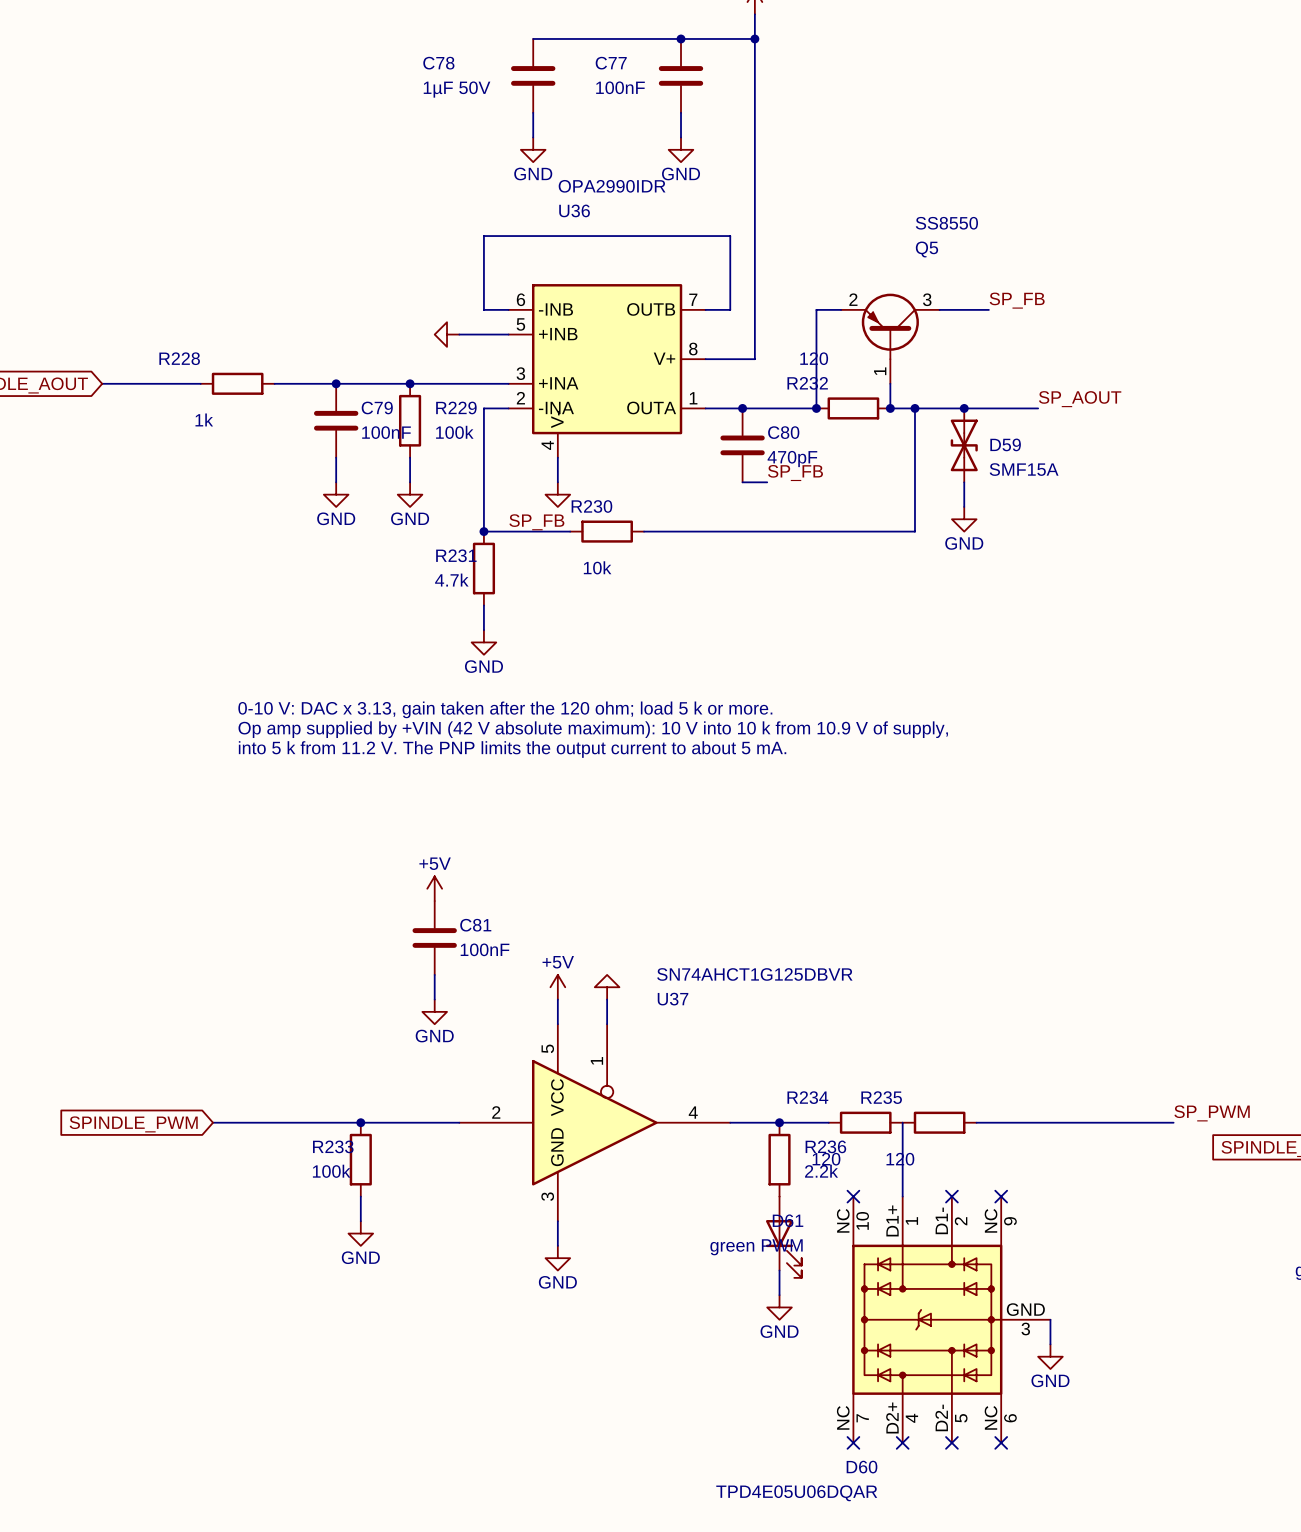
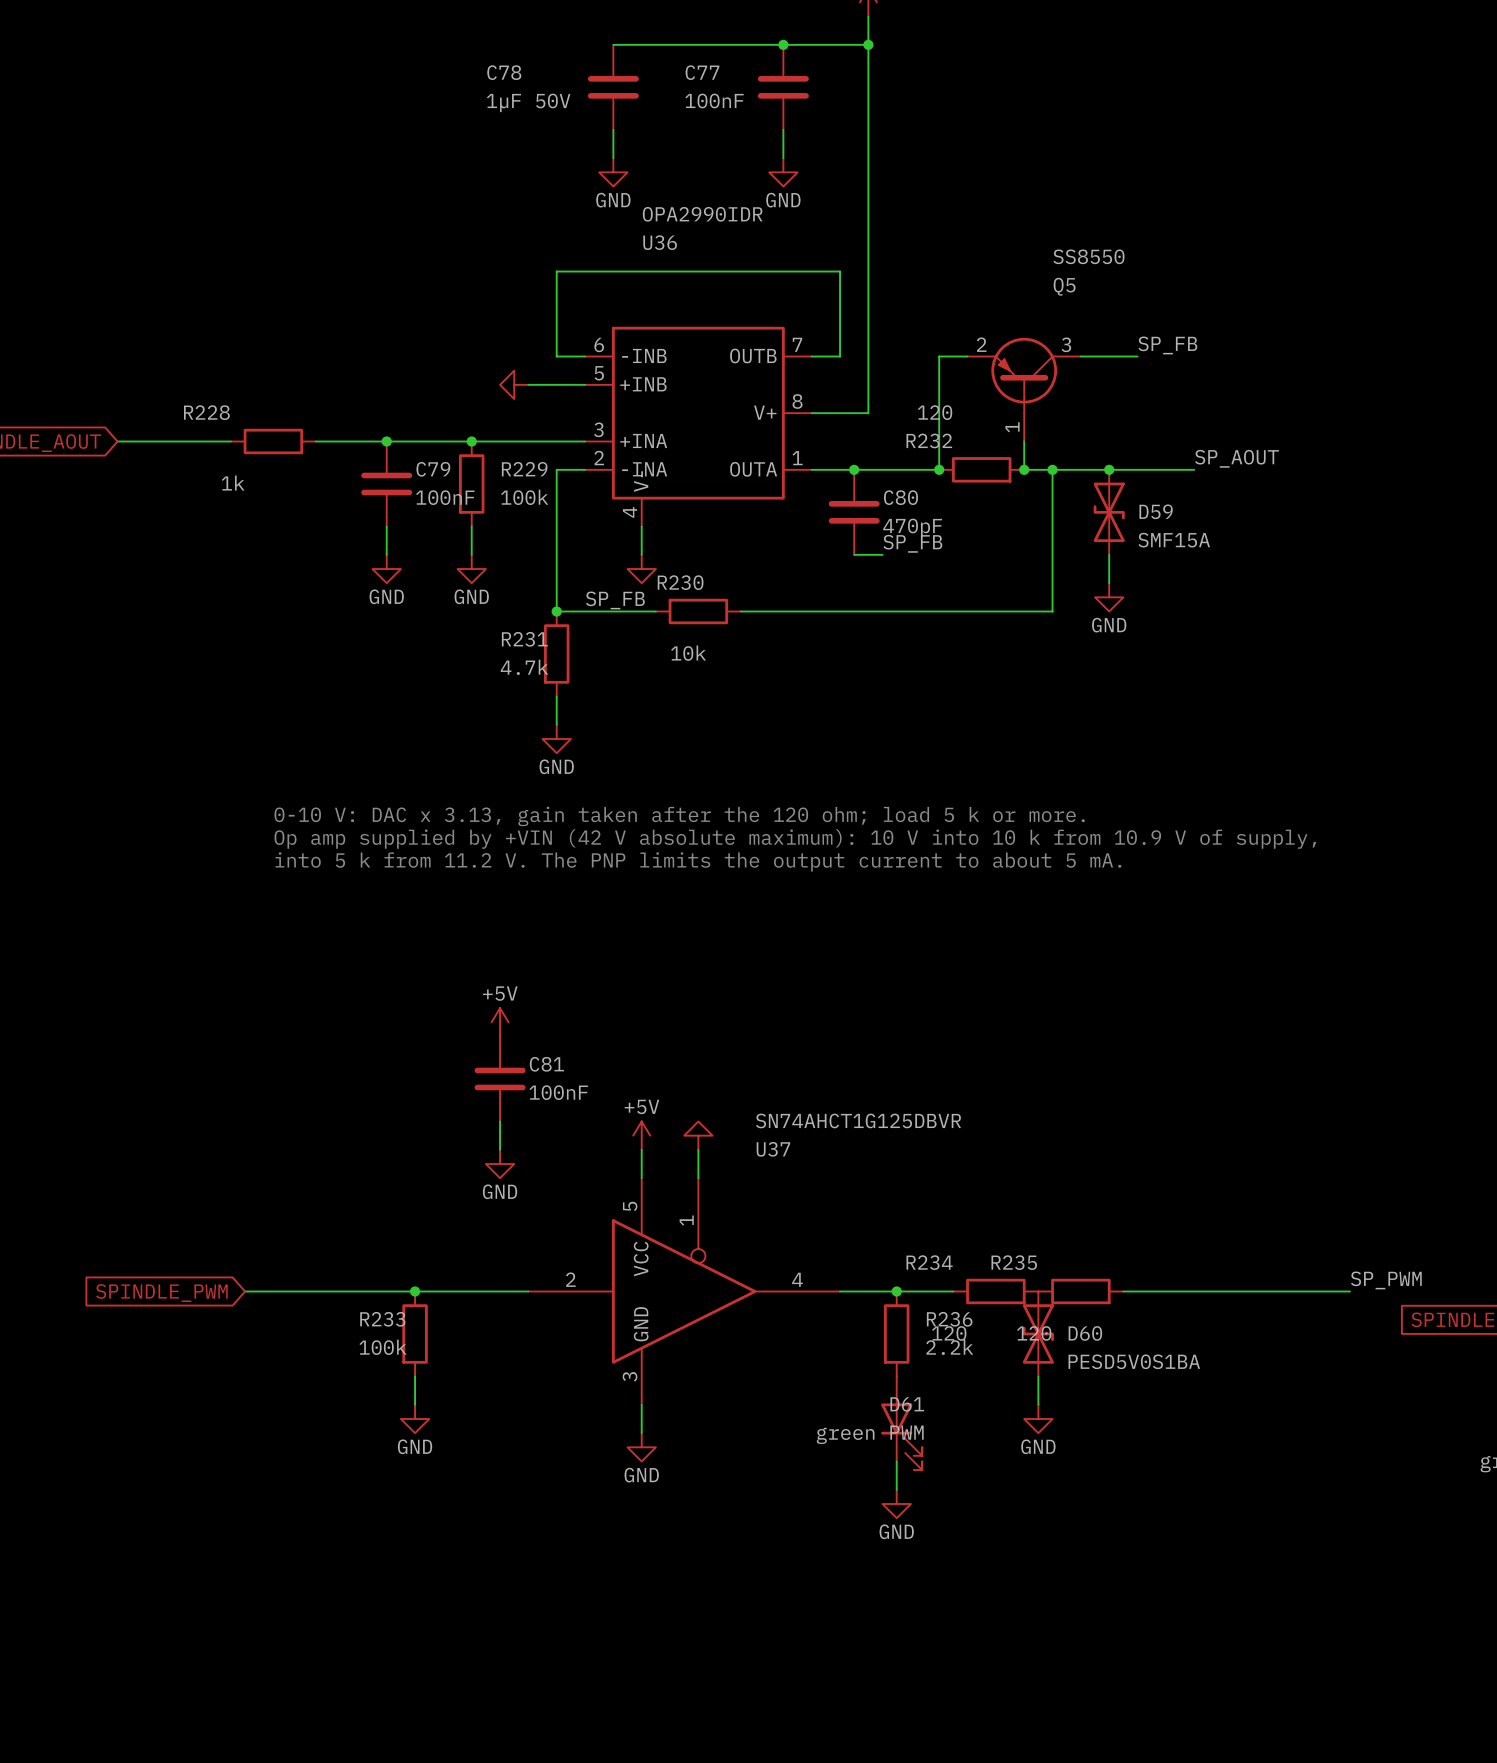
D60 symbol: [852, 1196, 1051, 1443] -> [1022, 1291, 1054, 1377]
no-connect mark: (853, 1196) -> none
no-connect mark: (951, 1196) -> none
no-connect mark: (1001, 1196) -> none
wire: (1050, 1319) (1050, 1344) -> none
power symbol position: GND (1050, 1356) -> GND (1038, 1418)
no-connect mark: (853, 1442) -> none
no-connect mark: (902, 1442) -> none
no-connect mark: (951, 1442) -> none
no-connect mark: (1001, 1442) -> none
D60 name position: D60 (862, 1467) -> D60 (1085, 1333)
D60 value: TPD4E05U06DQAR (796, 1493) -> PESD5V0S1BA (1134, 1361)

